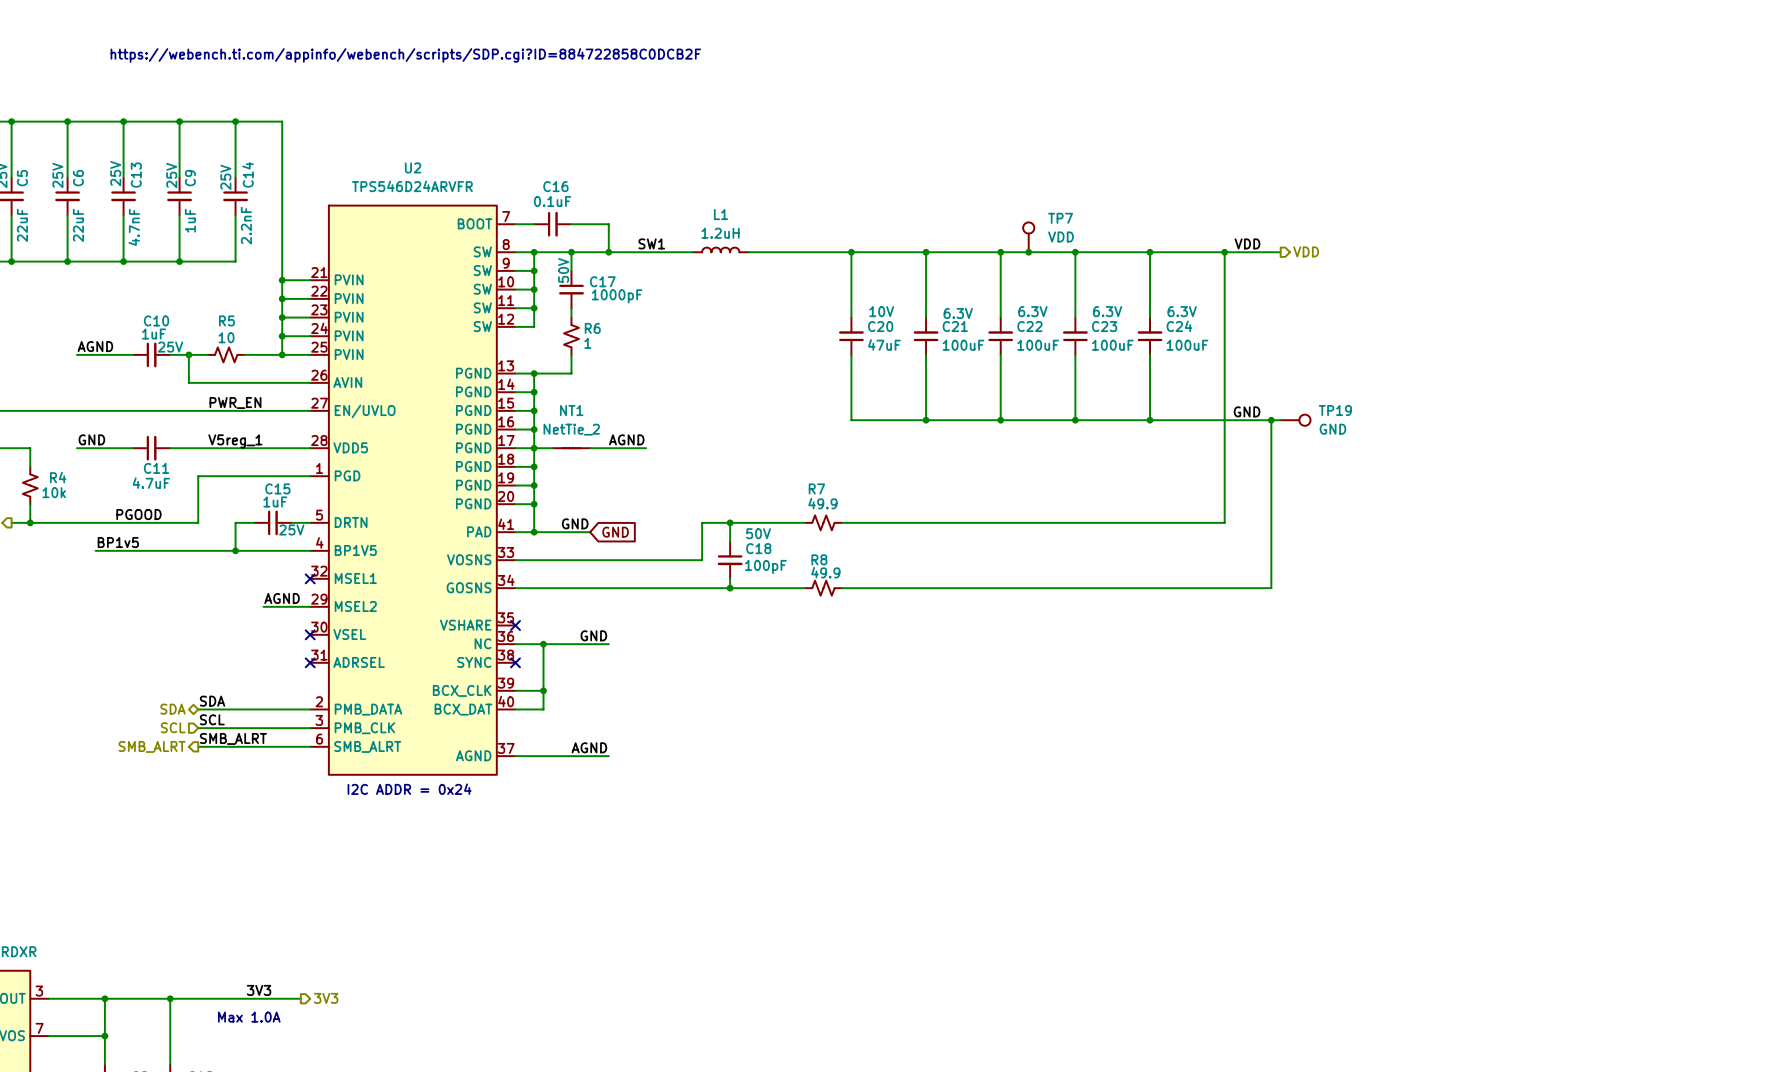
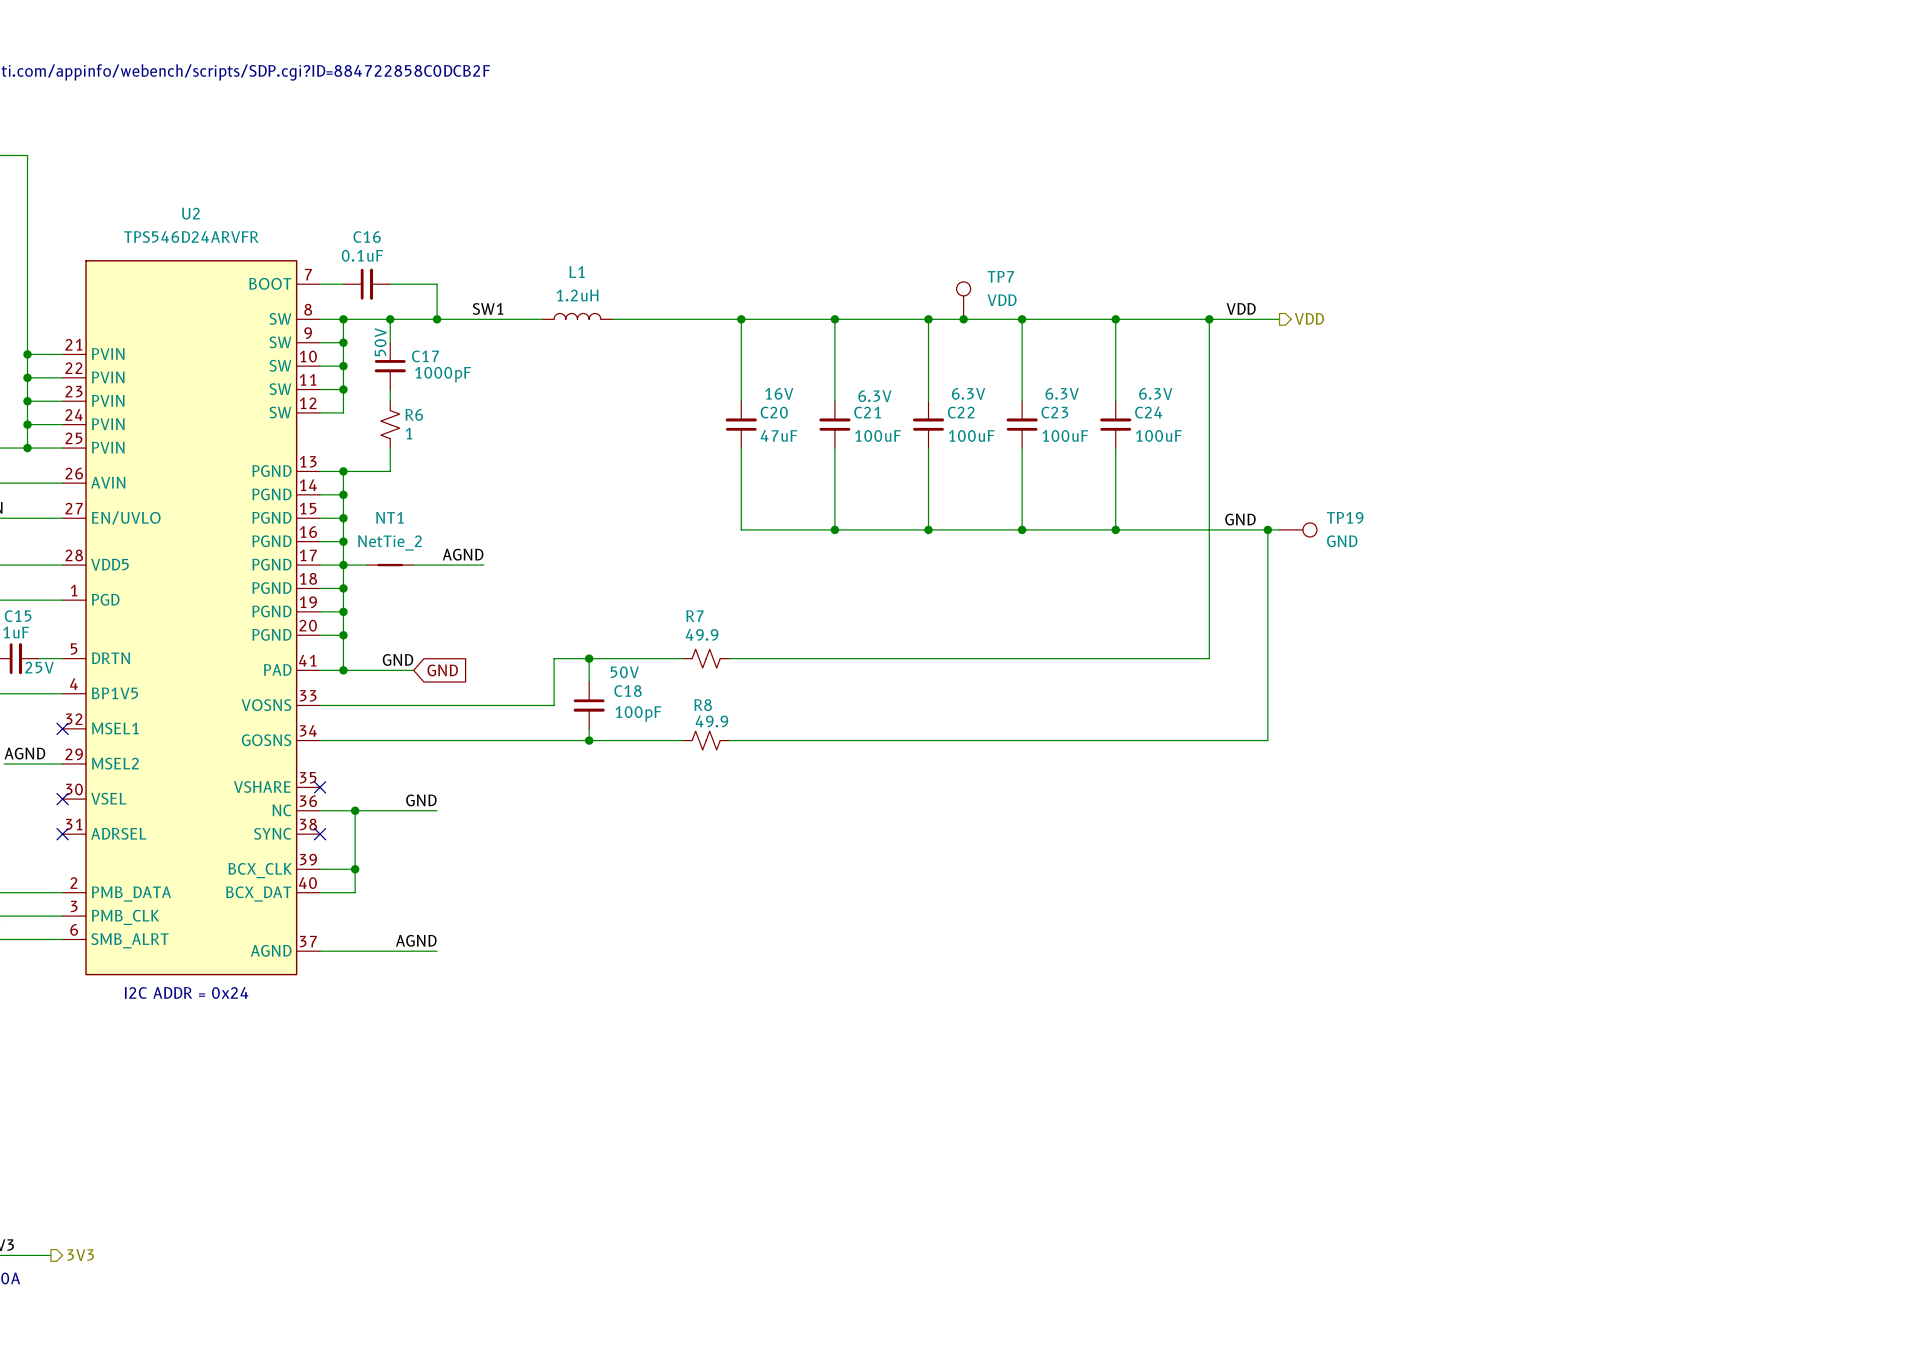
C20 text: 10V (881, 311) -> 16V (779, 393)

